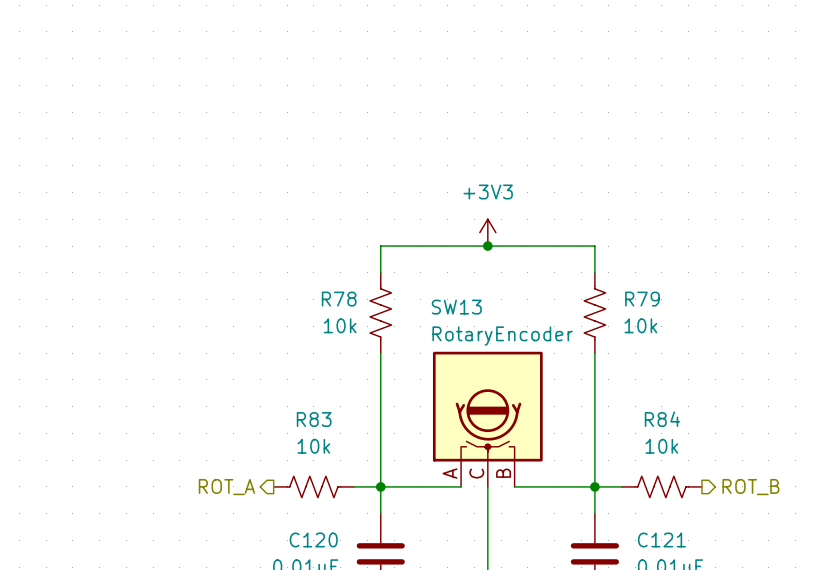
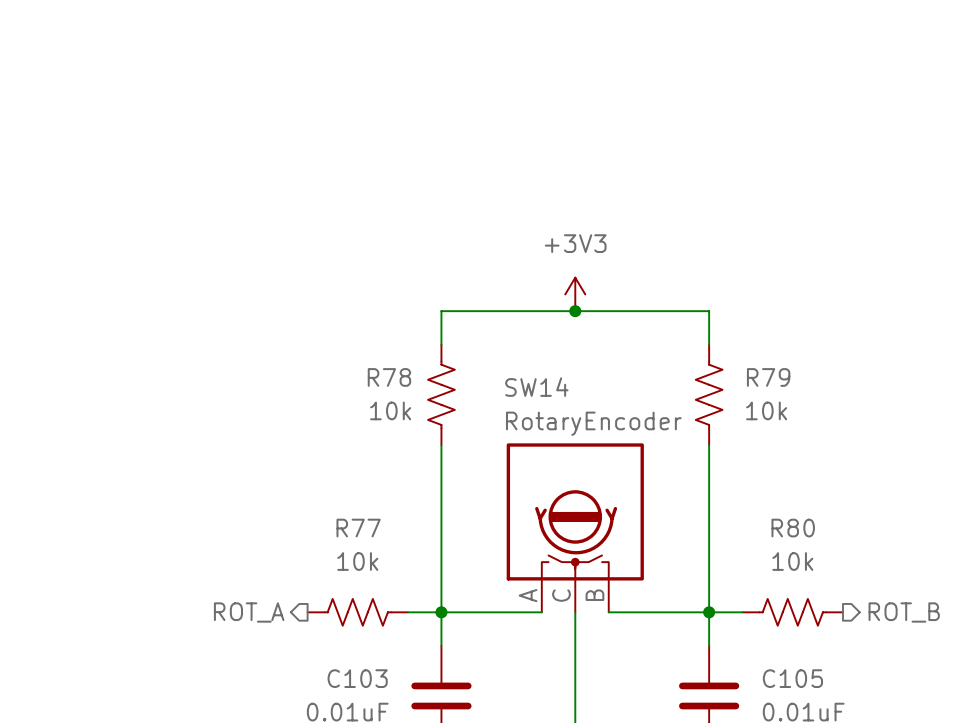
SW13 name: SW13 (456, 307) -> SW14 (536, 387)
R83 name: R83 (314, 419) -> R77 (358, 528)
R84 name: R84 (662, 419) -> R80 (793, 528)
C120 name: C120 (313, 539) -> C103 (357, 678)
C121 name: C121 (661, 539) -> C105 (792, 678)

